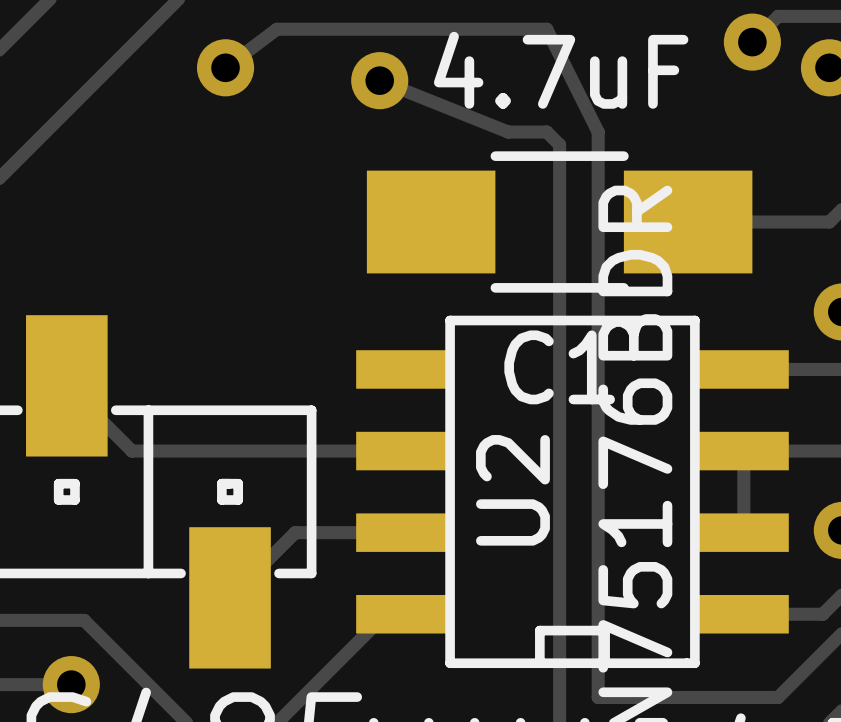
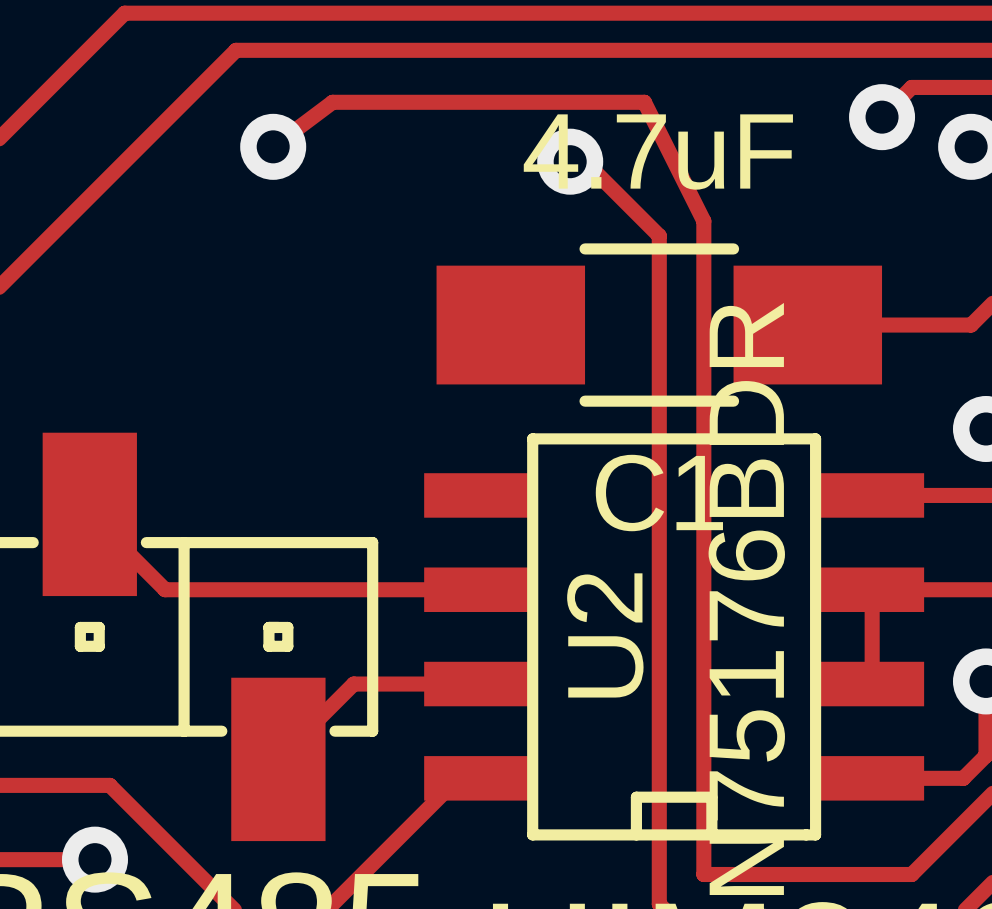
track: (379, 80) (508, 132) (546, 132) -> (570, 161) (585, 161) (644, 221)
via position: (379, 80) -> (570, 161)

